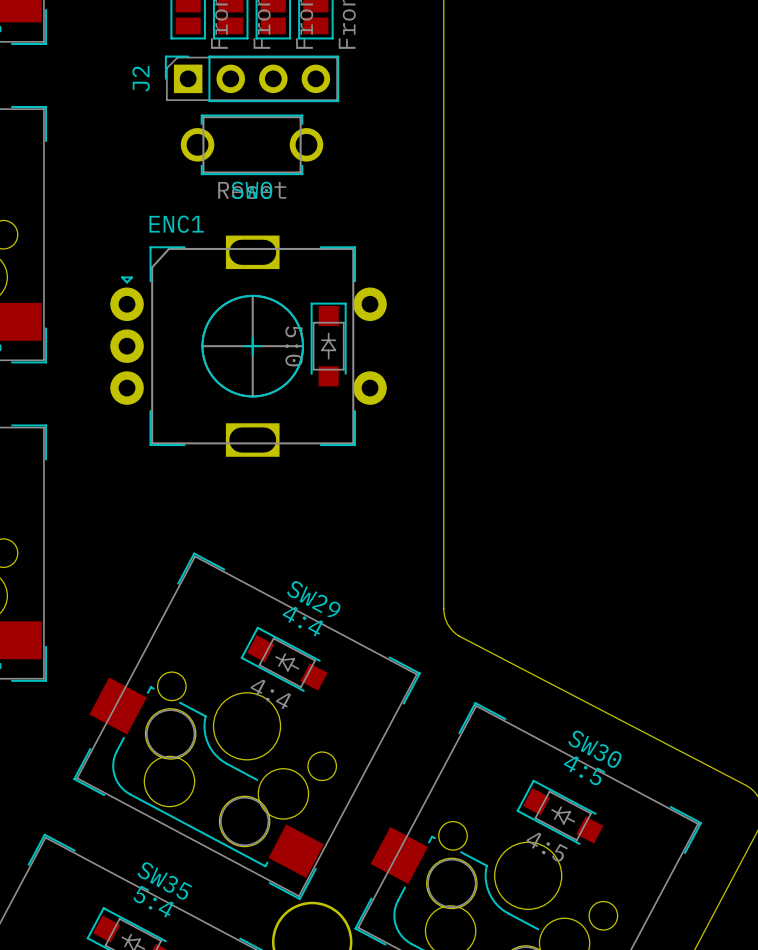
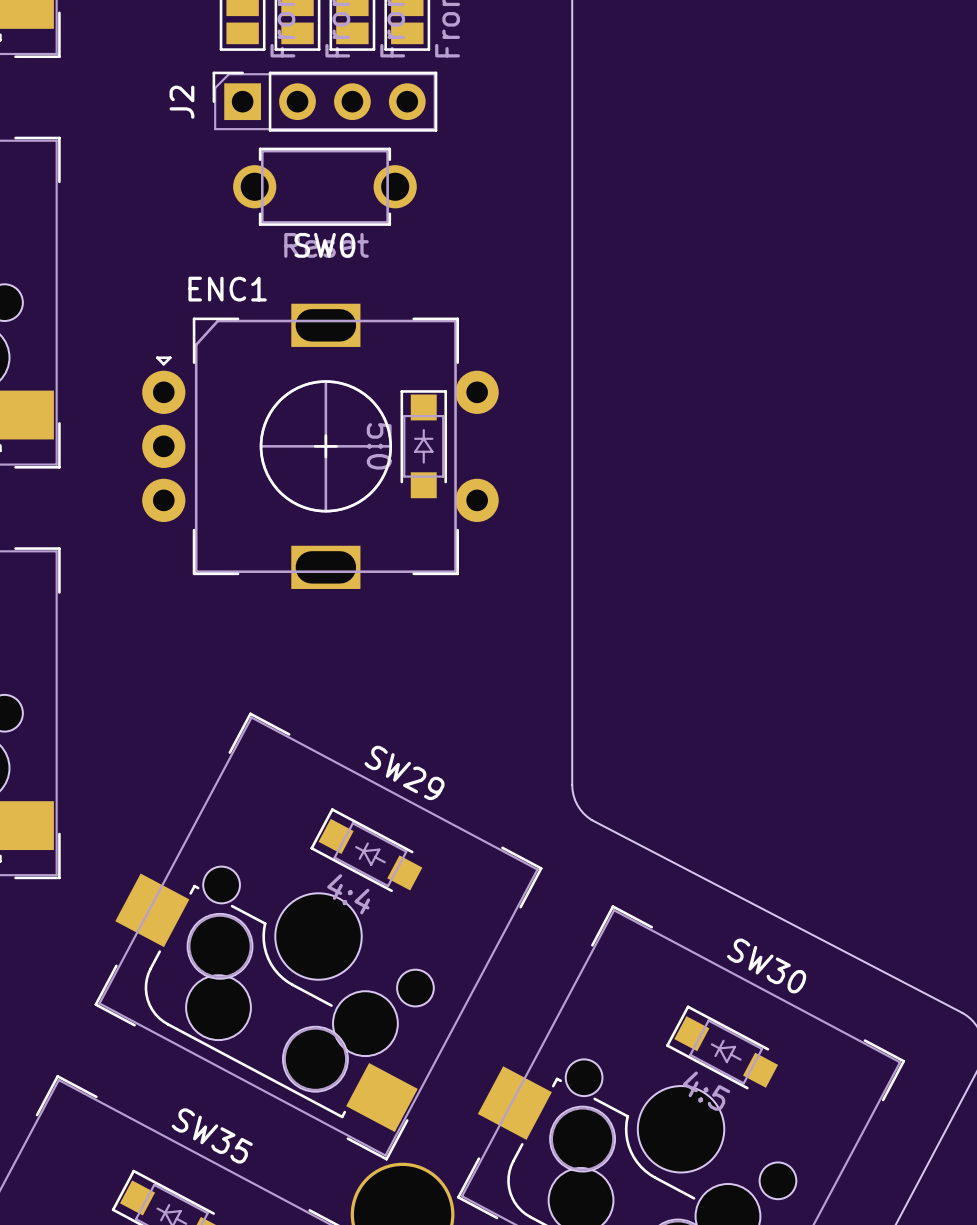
SW29 value: 4:4 (302, 621) -> none
SW30 value: 4:5 (584, 770) -> none
SW35 value: 5:4 (153, 901) -> none

